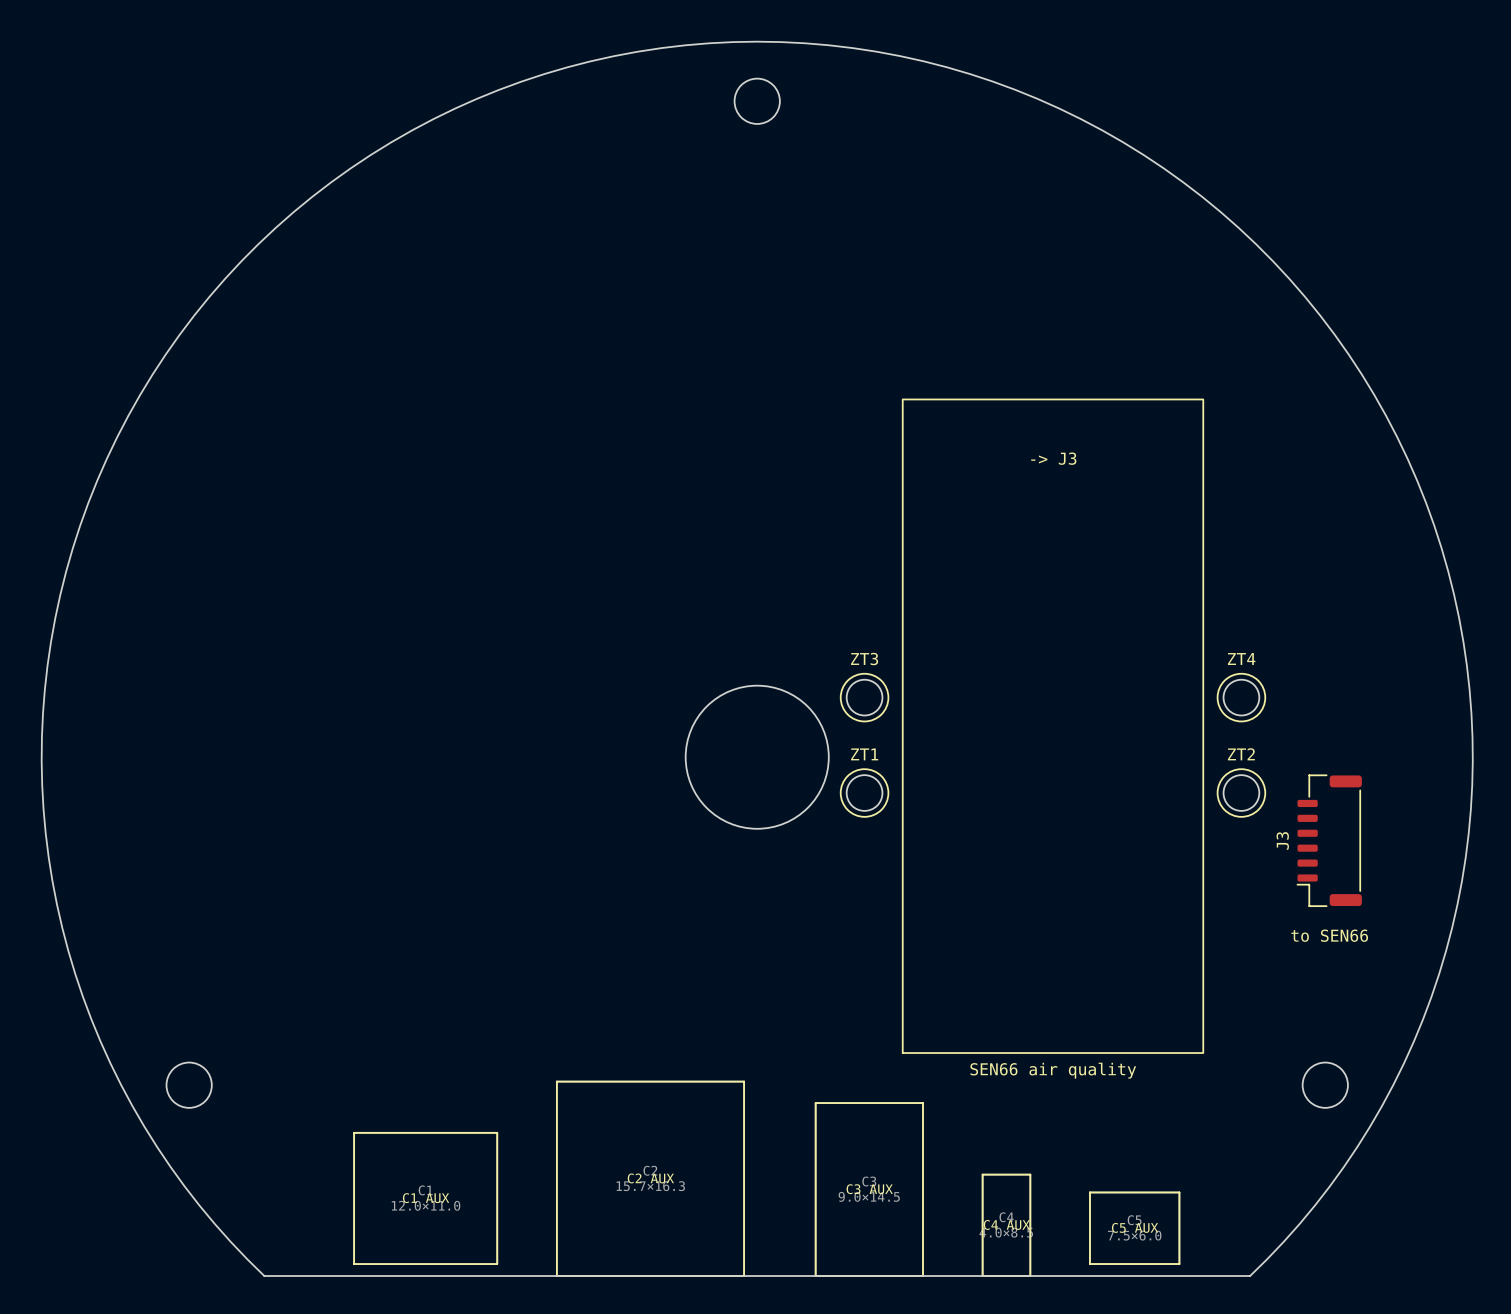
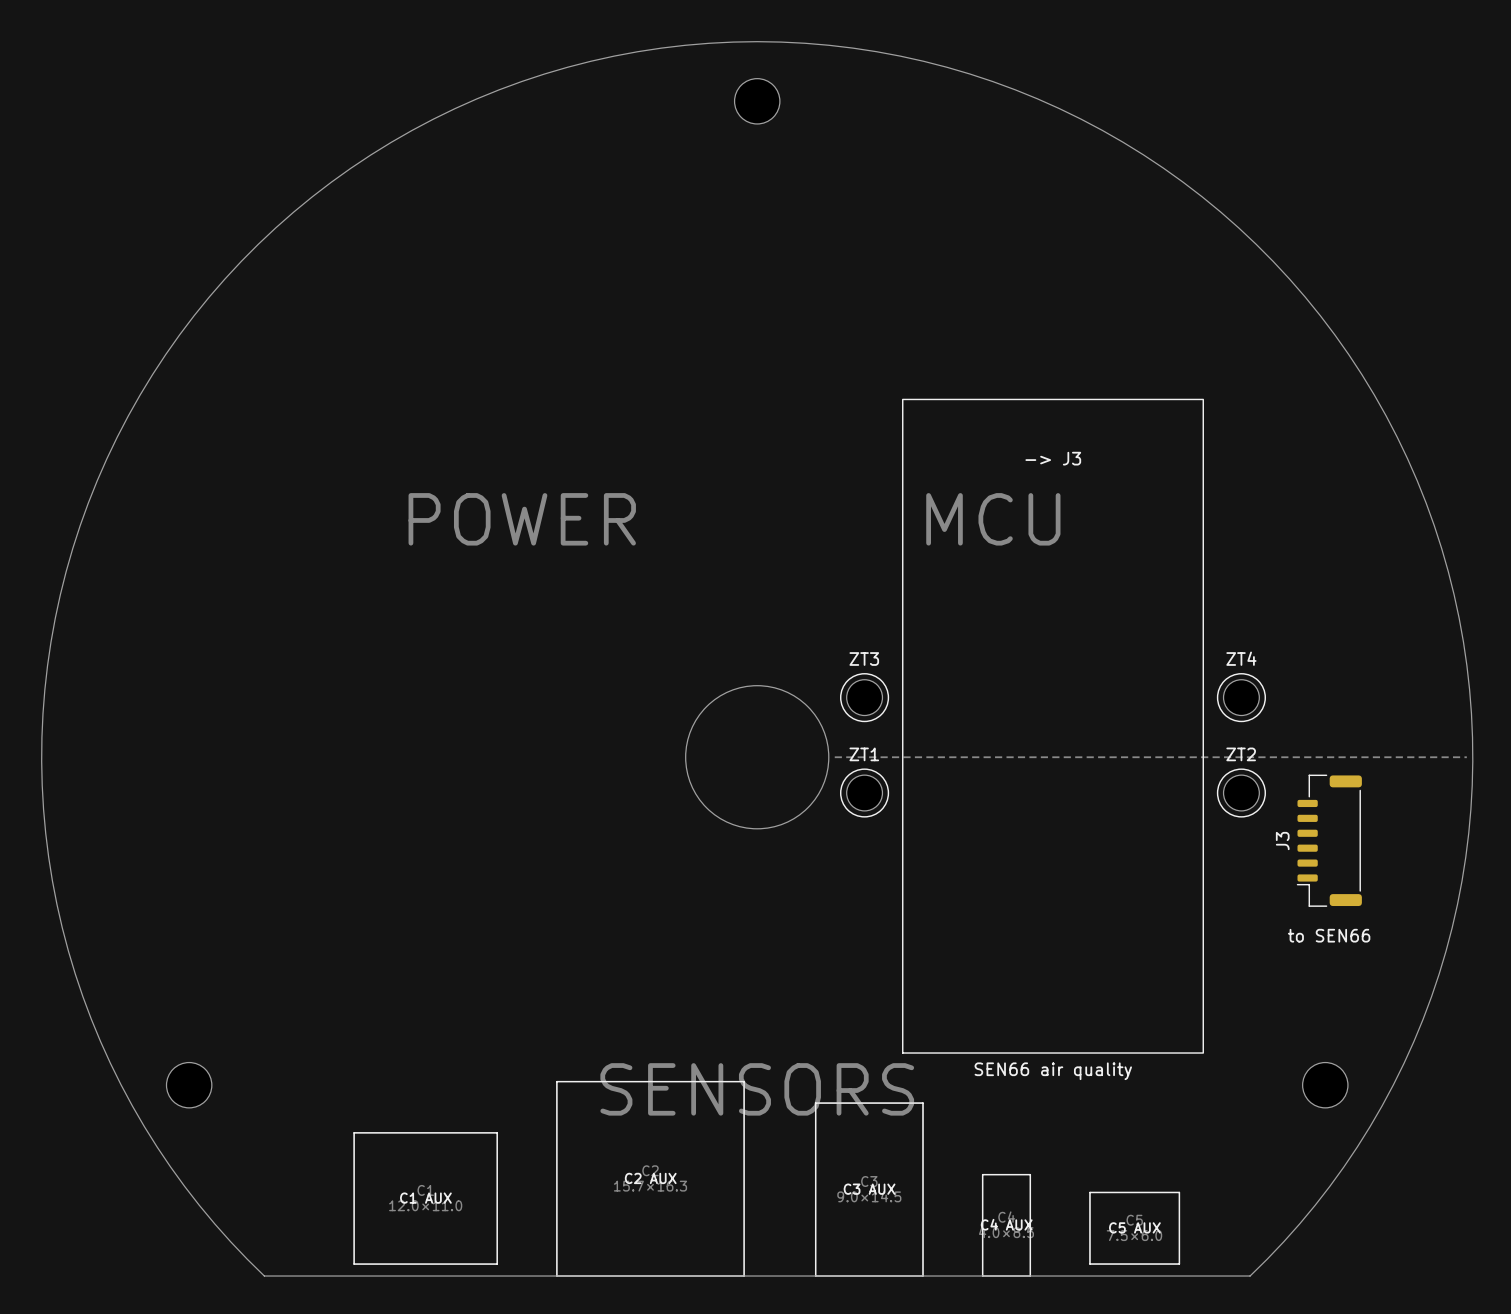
text: none -> POWER (522, 519)
text: none -> MCU (993, 519)
line: none -> (834, 757) (1466, 757)
text: none -> SENSORS (757, 1089)

